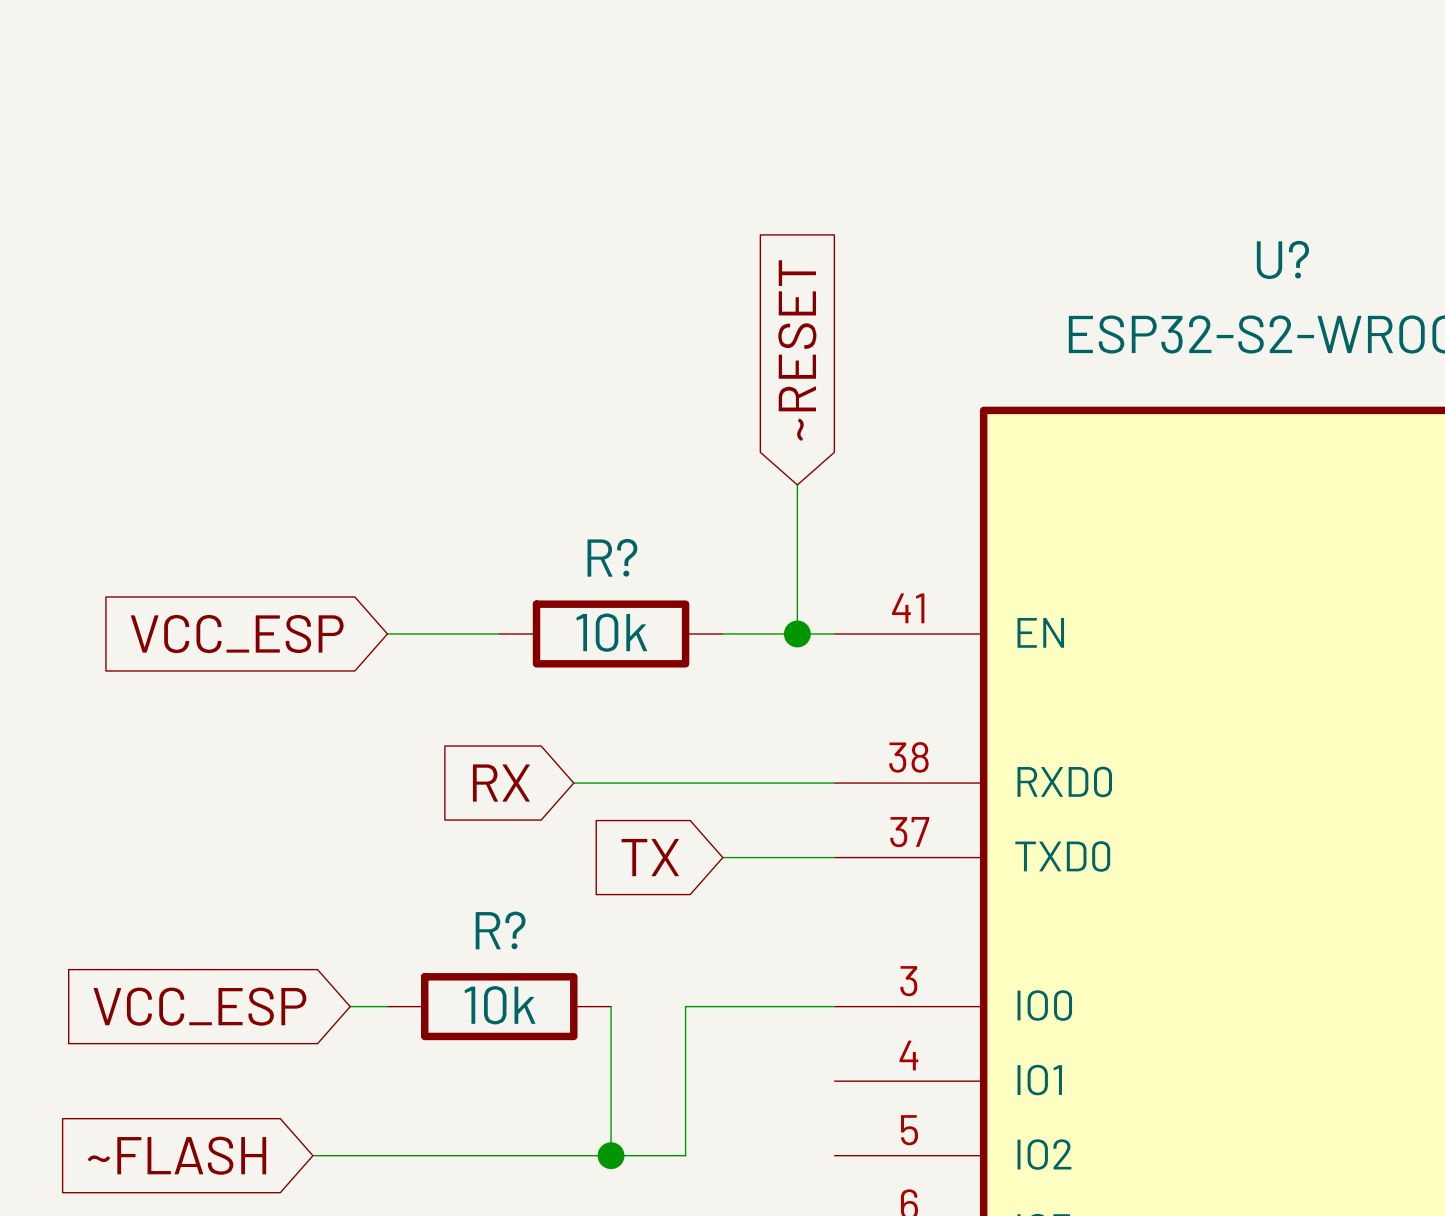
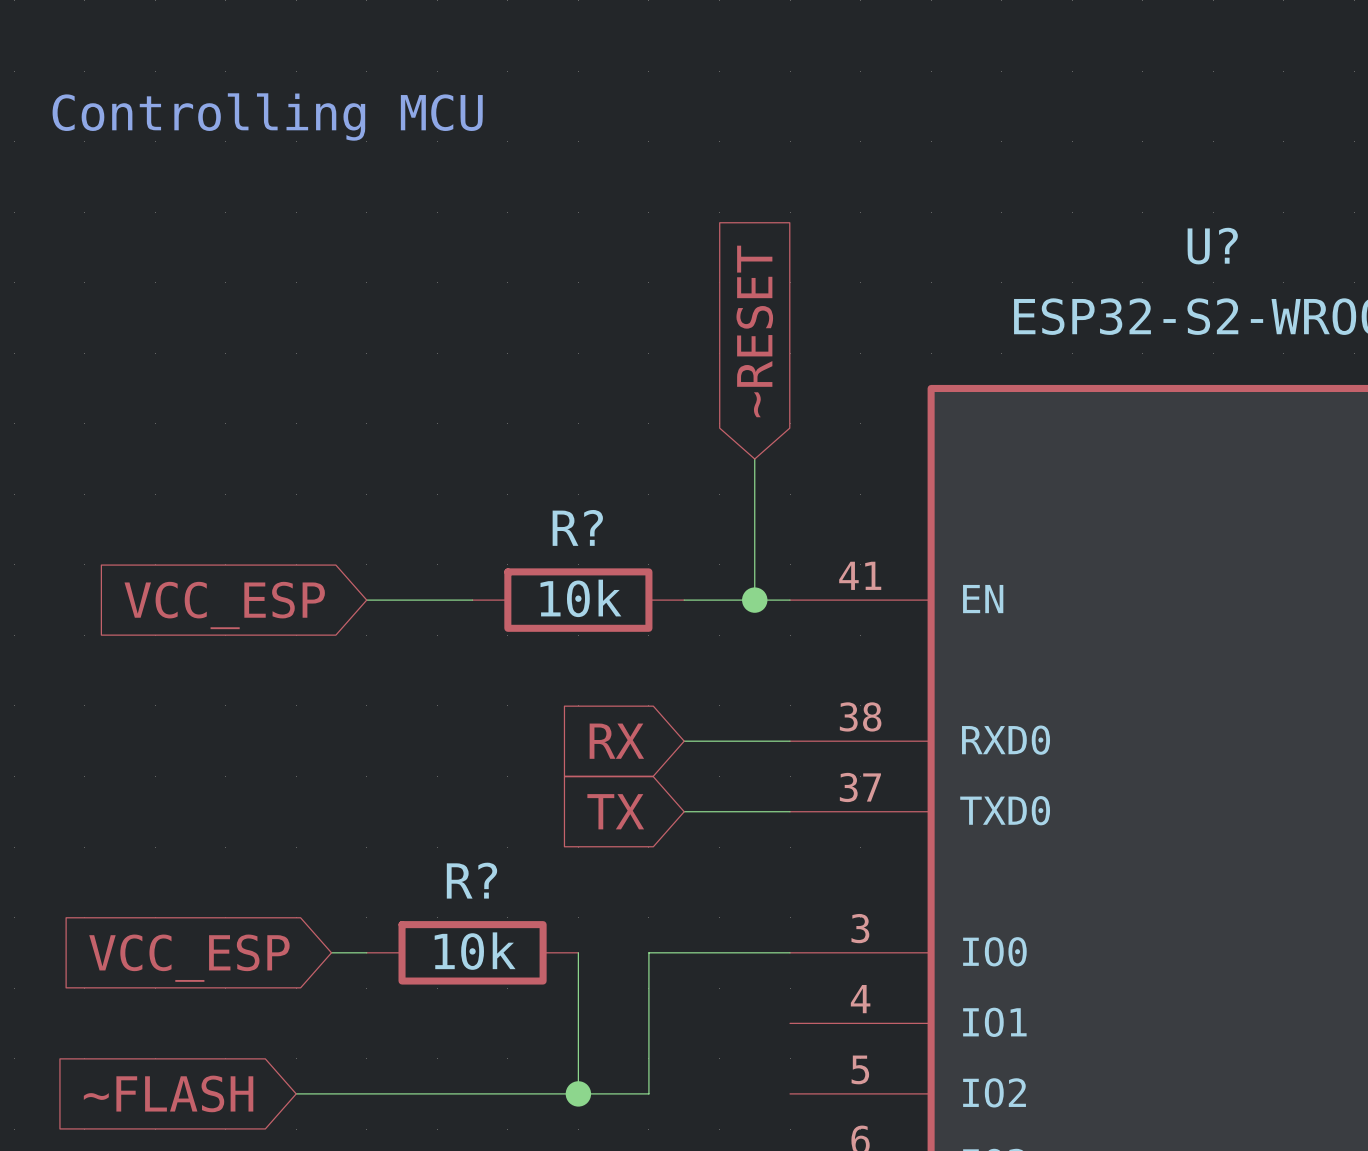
text: none -> Controlling MCU (267, 116)
global label position: RX (501, 783) -> RX (616, 741)
wire: (573, 783) (722, 783) -> none

